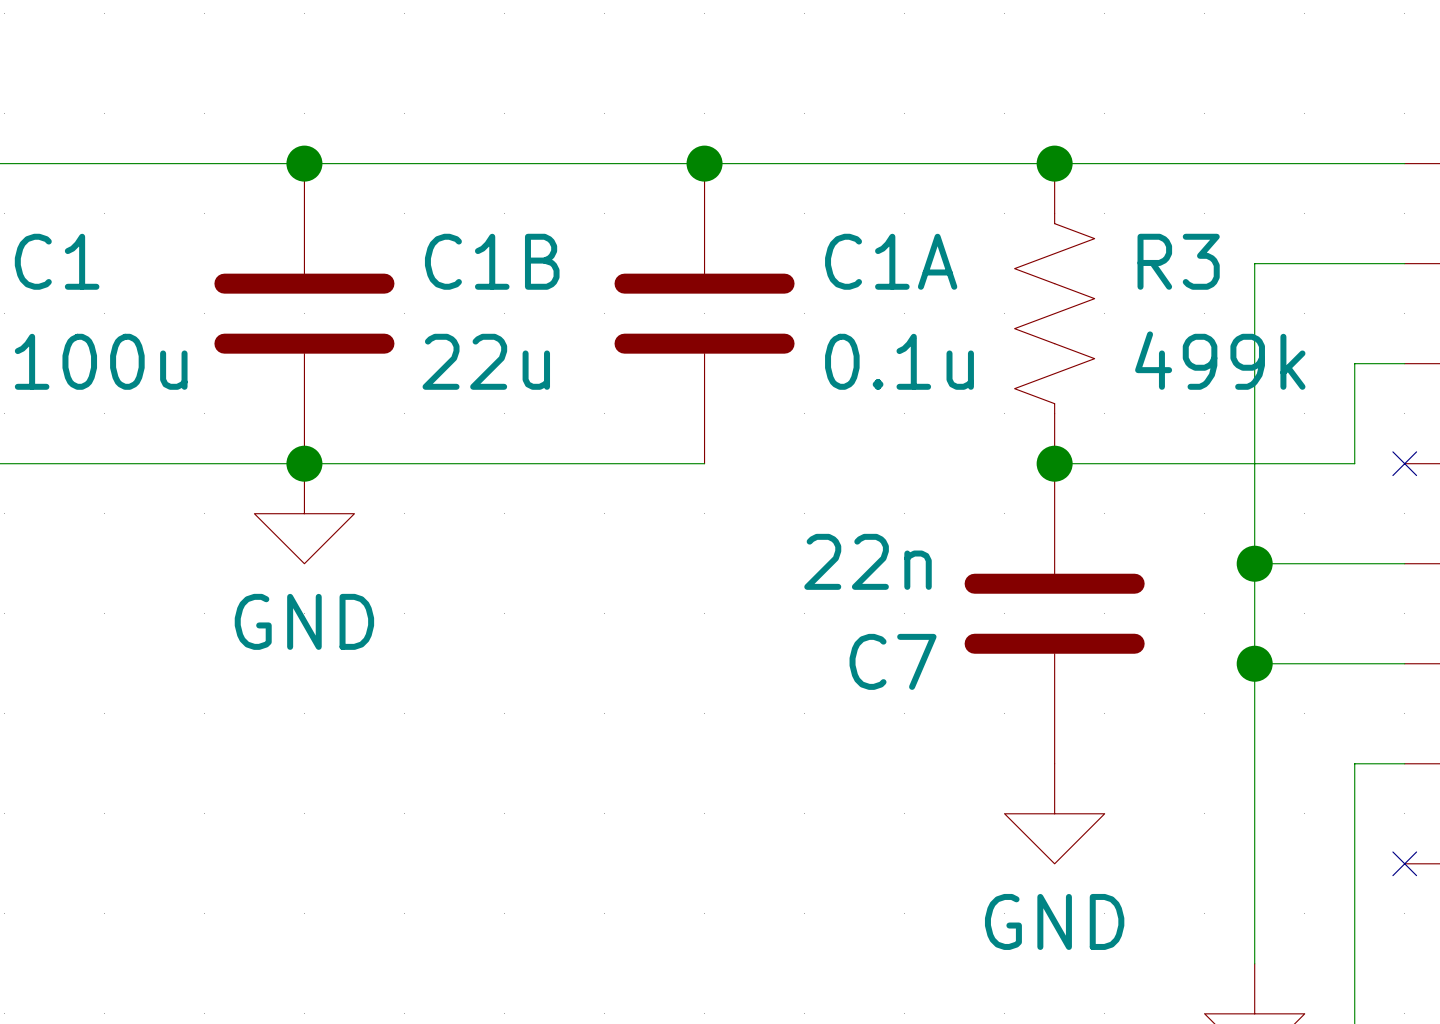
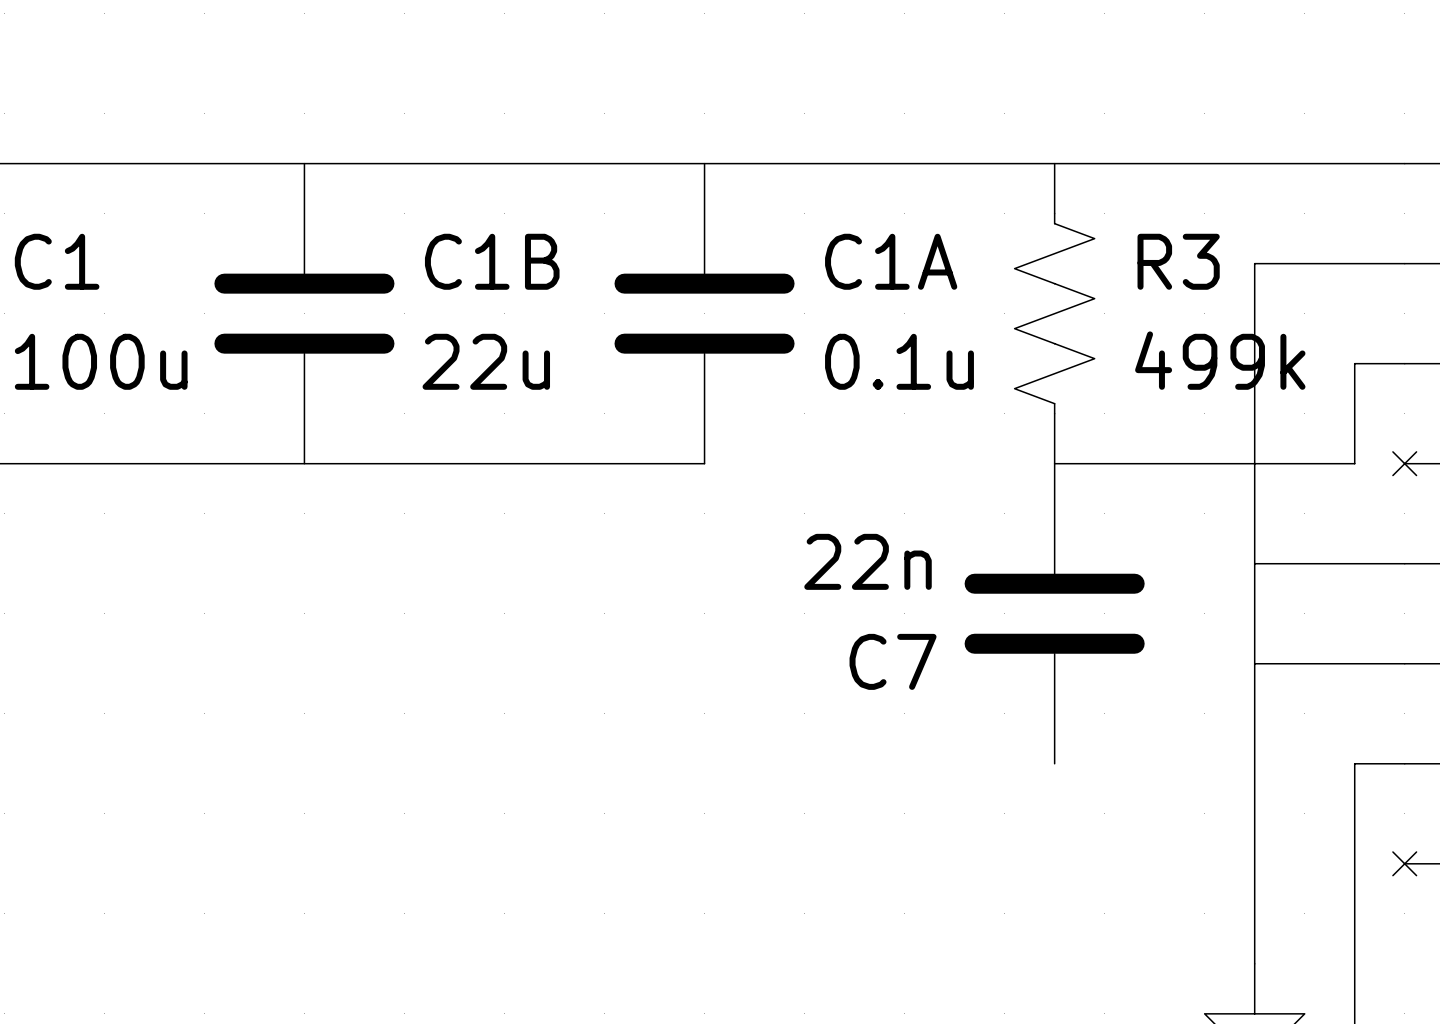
junction: (304, 163) -> none
junction: (704, 163) -> none
junction: (1054, 163) -> none
junction: (304, 463) -> none
junction: (1054, 463) -> none
power symbol: GND (304, 513) -> none
junction: (1254, 563) -> none
junction: (1254, 663) -> none
power symbol: GND (1054, 813) -> none

